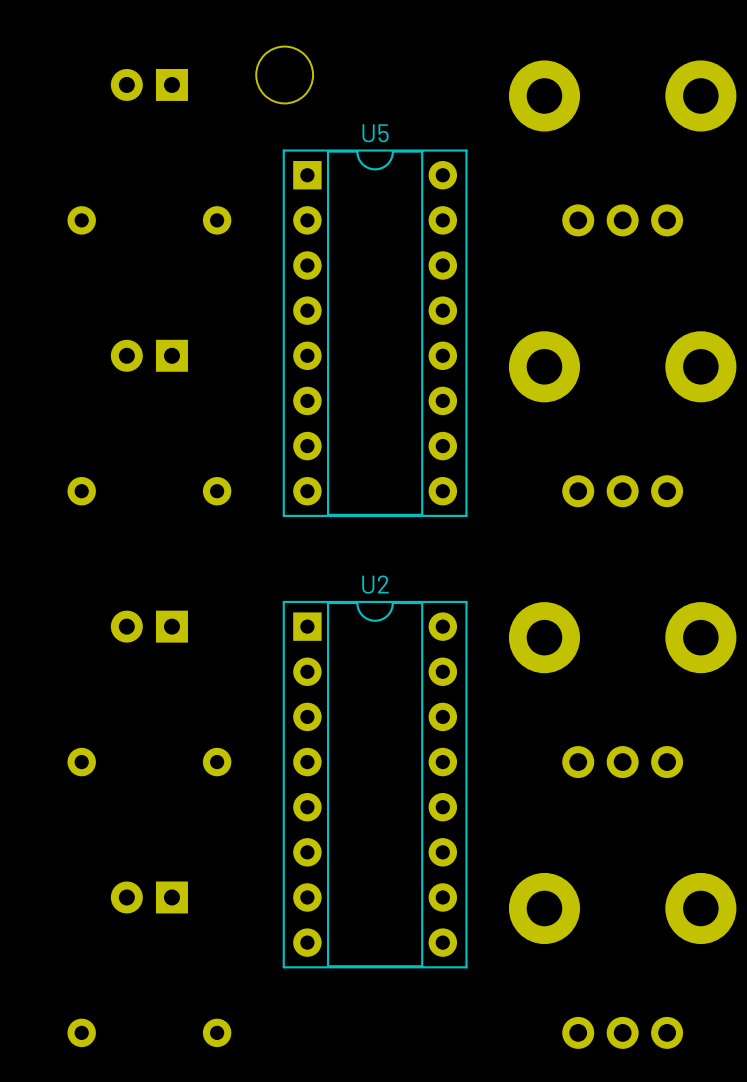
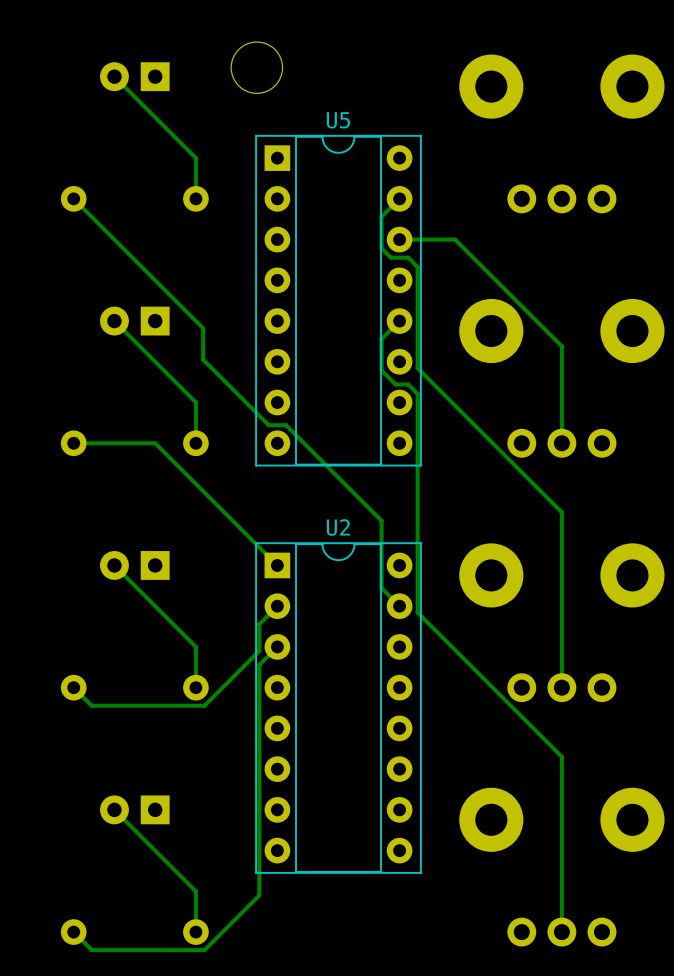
track: none -> (114, 76) (195, 158) (195, 198)
track: none -> (73, 198) (203, 328) (203, 359) (268, 425) (286, 425) (381, 520) (381, 588) (399, 606)
track: none -> (399, 198) (381, 216) (381, 248) (390, 257) (408, 257) (417, 267) (417, 368) (561, 512) (561, 687)
track: none -> (399, 239) (455, 239) (561, 346) (561, 443)
track: none -> (114, 321) (195, 402) (195, 443)
track: none -> (399, 321) (381, 339) (381, 370) (395, 384) (408, 384) (417, 393) (417, 612) (561, 756) (561, 932)
track: none -> (73, 443) (155, 443) (277, 565)
track: none -> (114, 565) (195, 646) (195, 687)
track: none -> (277, 606) (259, 624) (259, 650) (204, 705) (91, 705) (73, 687)
track: none -> (277, 646) (259, 664) (259, 895) (204, 950) (91, 950) (73, 932)
track: none -> (114, 809) (195, 891) (195, 932)

